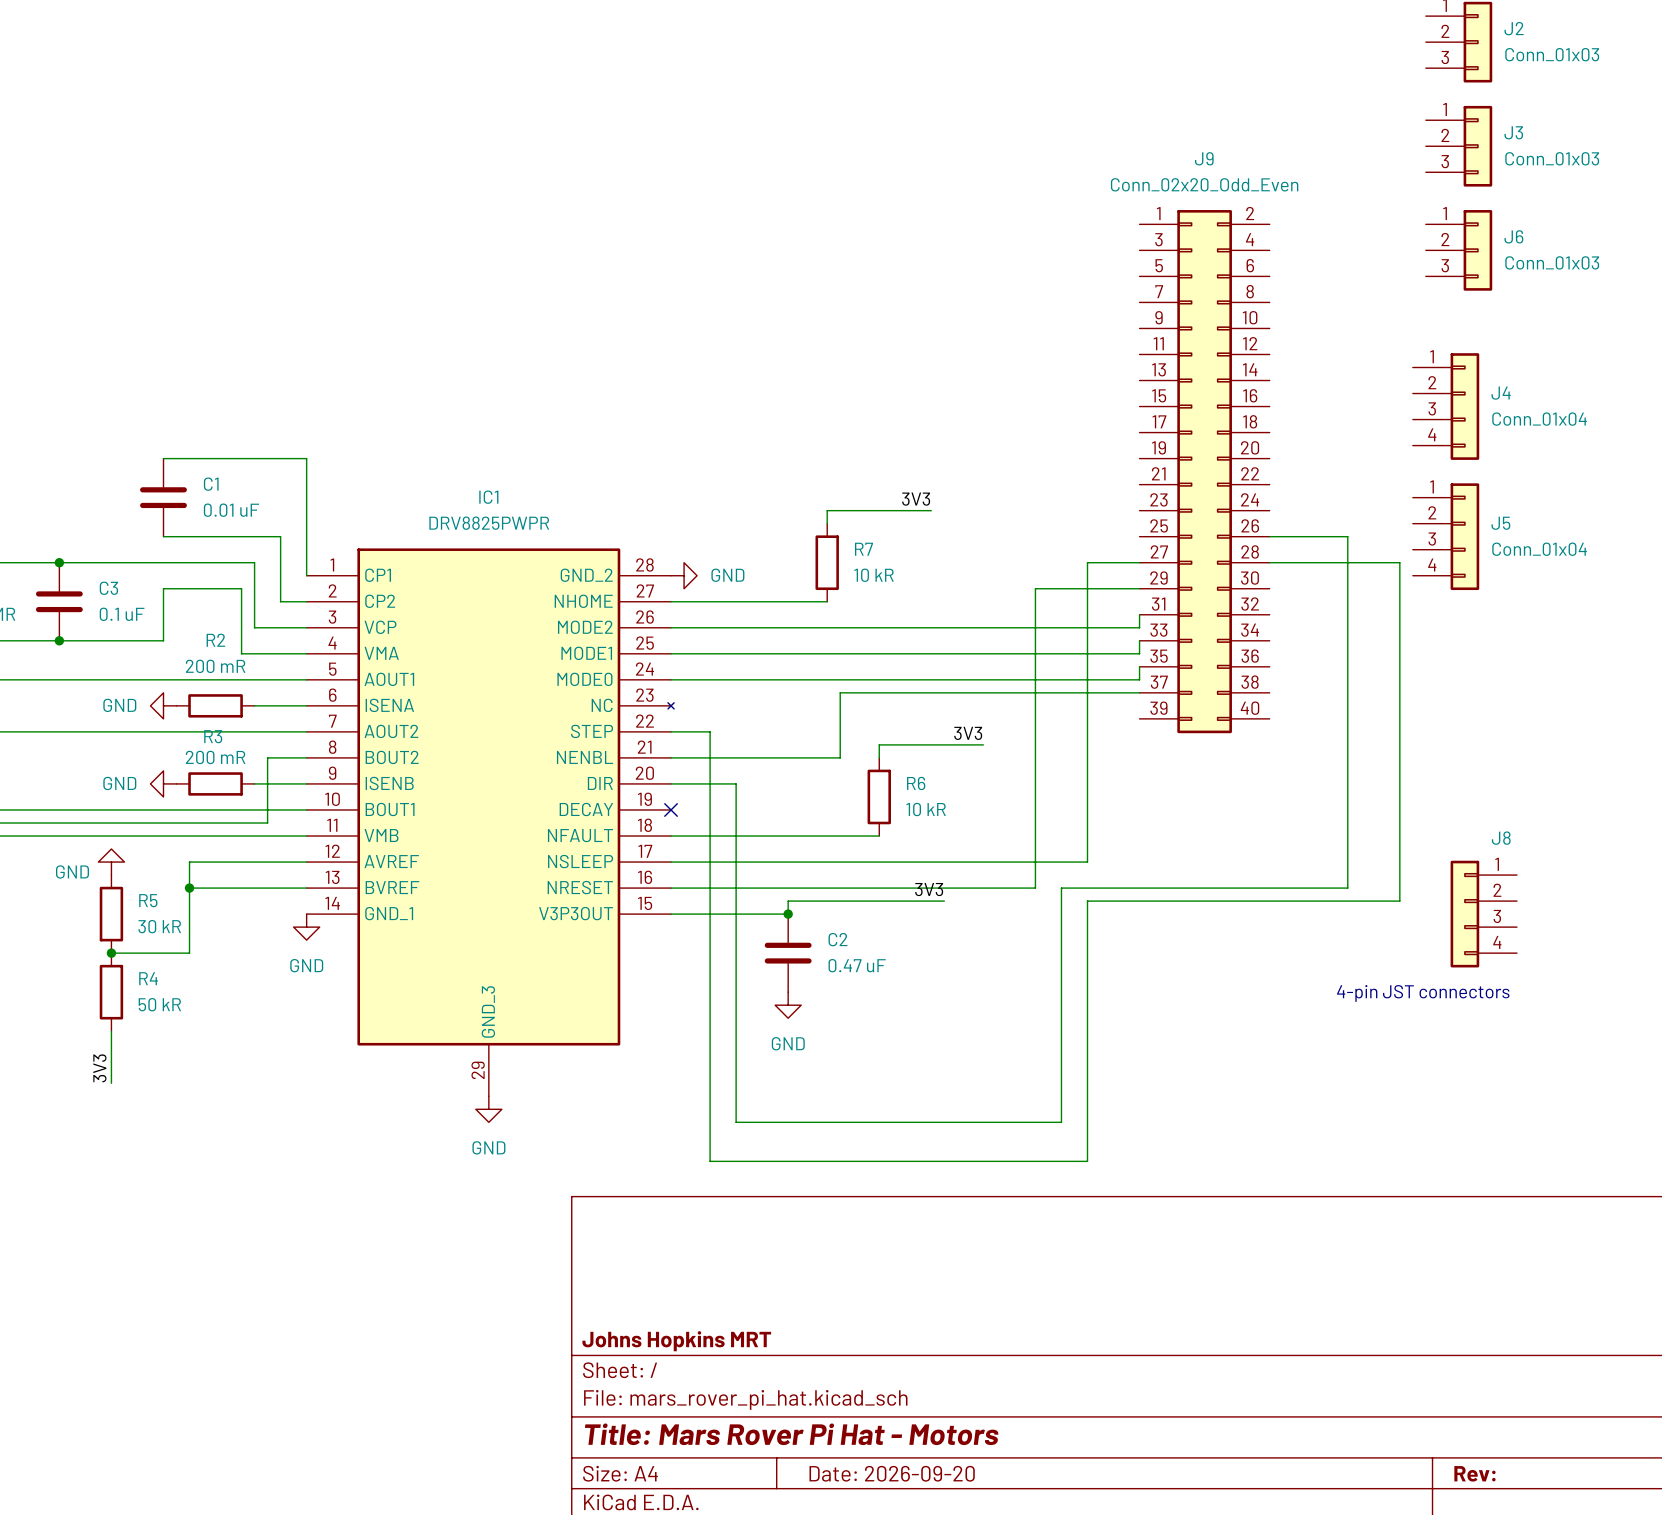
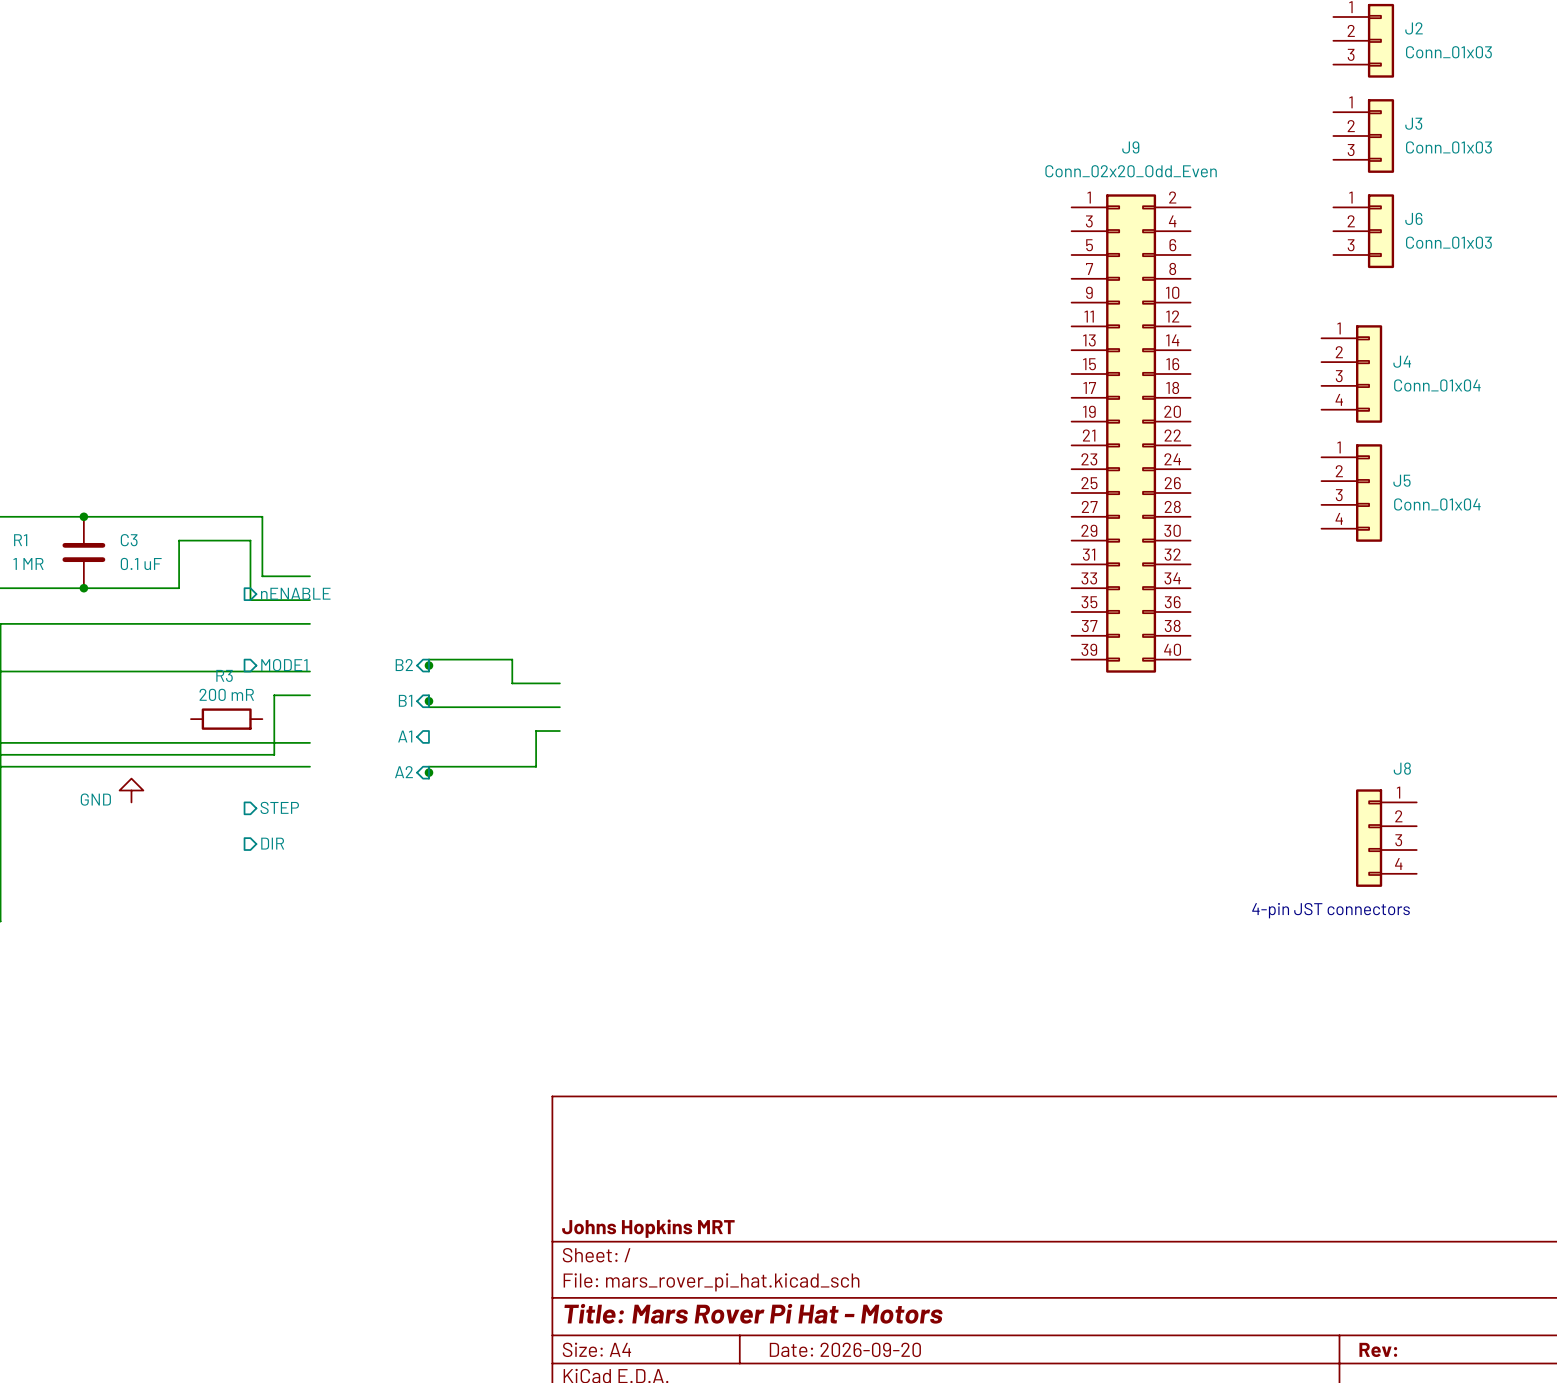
wire: (163, 458) (306, 458) (306, 575) -> none
C1: 0.01 uF (163, 497) -> none
label: 3V3 (916, 499) -> none
wire: (931, 510) (827, 510) (827, 523) -> none
wire: (163, 536) (280, 536) (280, 601) (306, 601) -> none
wire: (1269, 536) (1347, 536) (1347, 888) (1061, 888) (1061, 1122) (736, 1122) (736, 783) (671, 783) -> none
R7: 10 kR (827, 562) -> none
wire: (1139, 562) (1087, 562) (1087, 862) (671, 862) -> none
wire: (1269, 562) (1399, 562) (1399, 901) (1087, 901) (1087, 1161) (710, 1161) (710, 731) (671, 731) -> none
power symbol: GND (684, 575) -> none
wire: (1139, 588) (1035, 588) (1035, 888) (671, 888) -> none
wire: (671, 601) (827, 601) -> none
wire: (1139, 614) (1139, 627) (671, 627) -> none
wire: (1139, 640) (1139, 653) (671, 653) -> none
sheet pin: none -> nENABLE (295, 593)
wire: (1139, 666) (1139, 679) (671, 679) -> none
wire: (1139, 692) (840, 692) (840, 757) (671, 757) -> none
power symbol: GND (163, 705) -> none
R2: 200 mR (215, 705) -> none
wire: (254, 705) (306, 705) -> none
sheet pin: none -> MODE1 (284, 665)
sheet pin: none -> B2 (404, 665)
junction: none -> (428, 665)
label: 3V3 (968, 733) -> none
wire: (983, 744) (879, 744) (879, 757) -> none
sheet pin: none -> B1 (405, 700)
junction: none -> (428, 701)
power symbol: GND (163, 783) -> none
wire: (254, 783) (306, 783) -> none
R6: 10 kR (879, 796) -> none
sheet pin: none -> A1 (405, 736)
no-connect mark: (671, 809) -> none
IC1: DRV8825PWPR (490, 822) -> none
wire: (671, 836) (879, 836) -> none
sheet pin: none -> A2 (403, 772)
junction: none -> (428, 772)
wire: (306, 862) (189, 862) (189, 953) (111, 953) -> none
sheet pin: none -> STEP (279, 807)
wire: (189, 888) (306, 888) -> none
junction: (189, 888) -> none
label: 3V3 (929, 889) -> none
wire: (944, 901) (788, 901) (788, 914) (671, 914) -> none
R5: 30 kR (111, 914) -> none
junction: (788, 914) -> none
sheet pin: none -> DIR (272, 843)
power symbol: GND (306, 927) -> none
junction: (111, 953) -> none
C2: 0.47 uF (788, 953) -> none
R4: 50 kR (111, 992) -> none
power symbol: GND (788, 1005) -> none
wire: (111, 1031) (111, 1083) -> none
label: 3V3 (99, 1068) -> none
power symbol: GND (488, 1109) -> none

